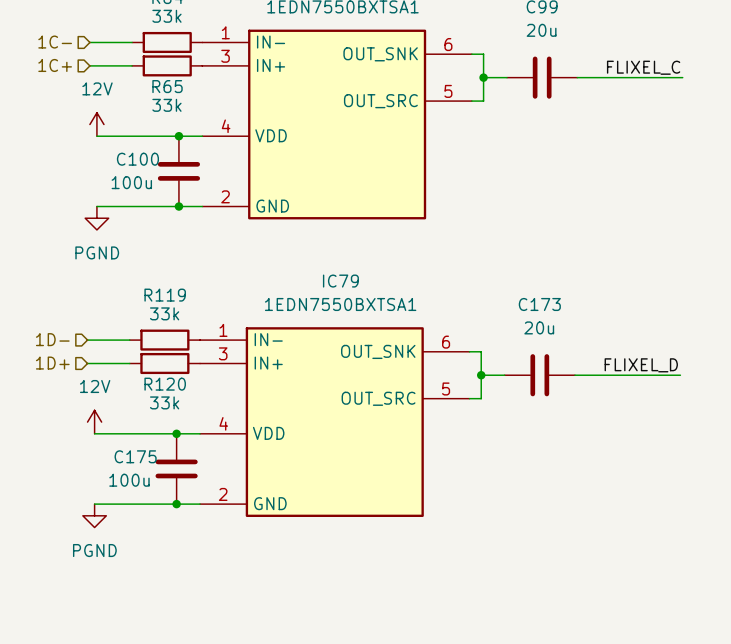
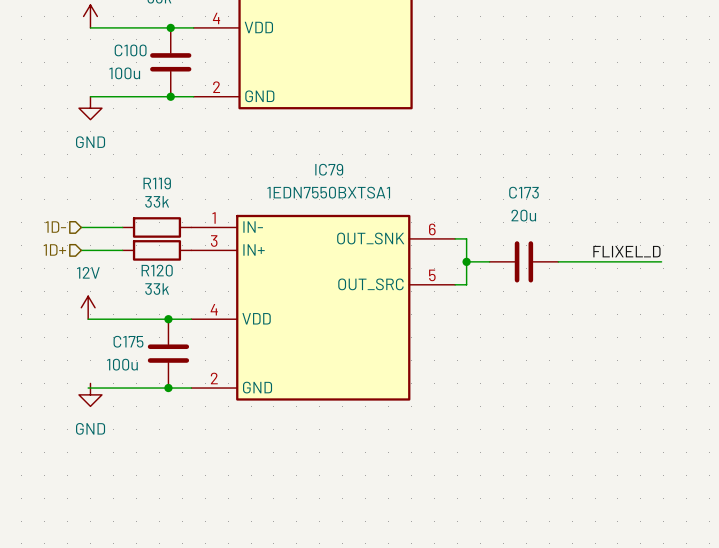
power symbol: PGND (96, 218) -> GND (90, 108)
power symbol: PGND (94, 515) -> GND (90, 394)

